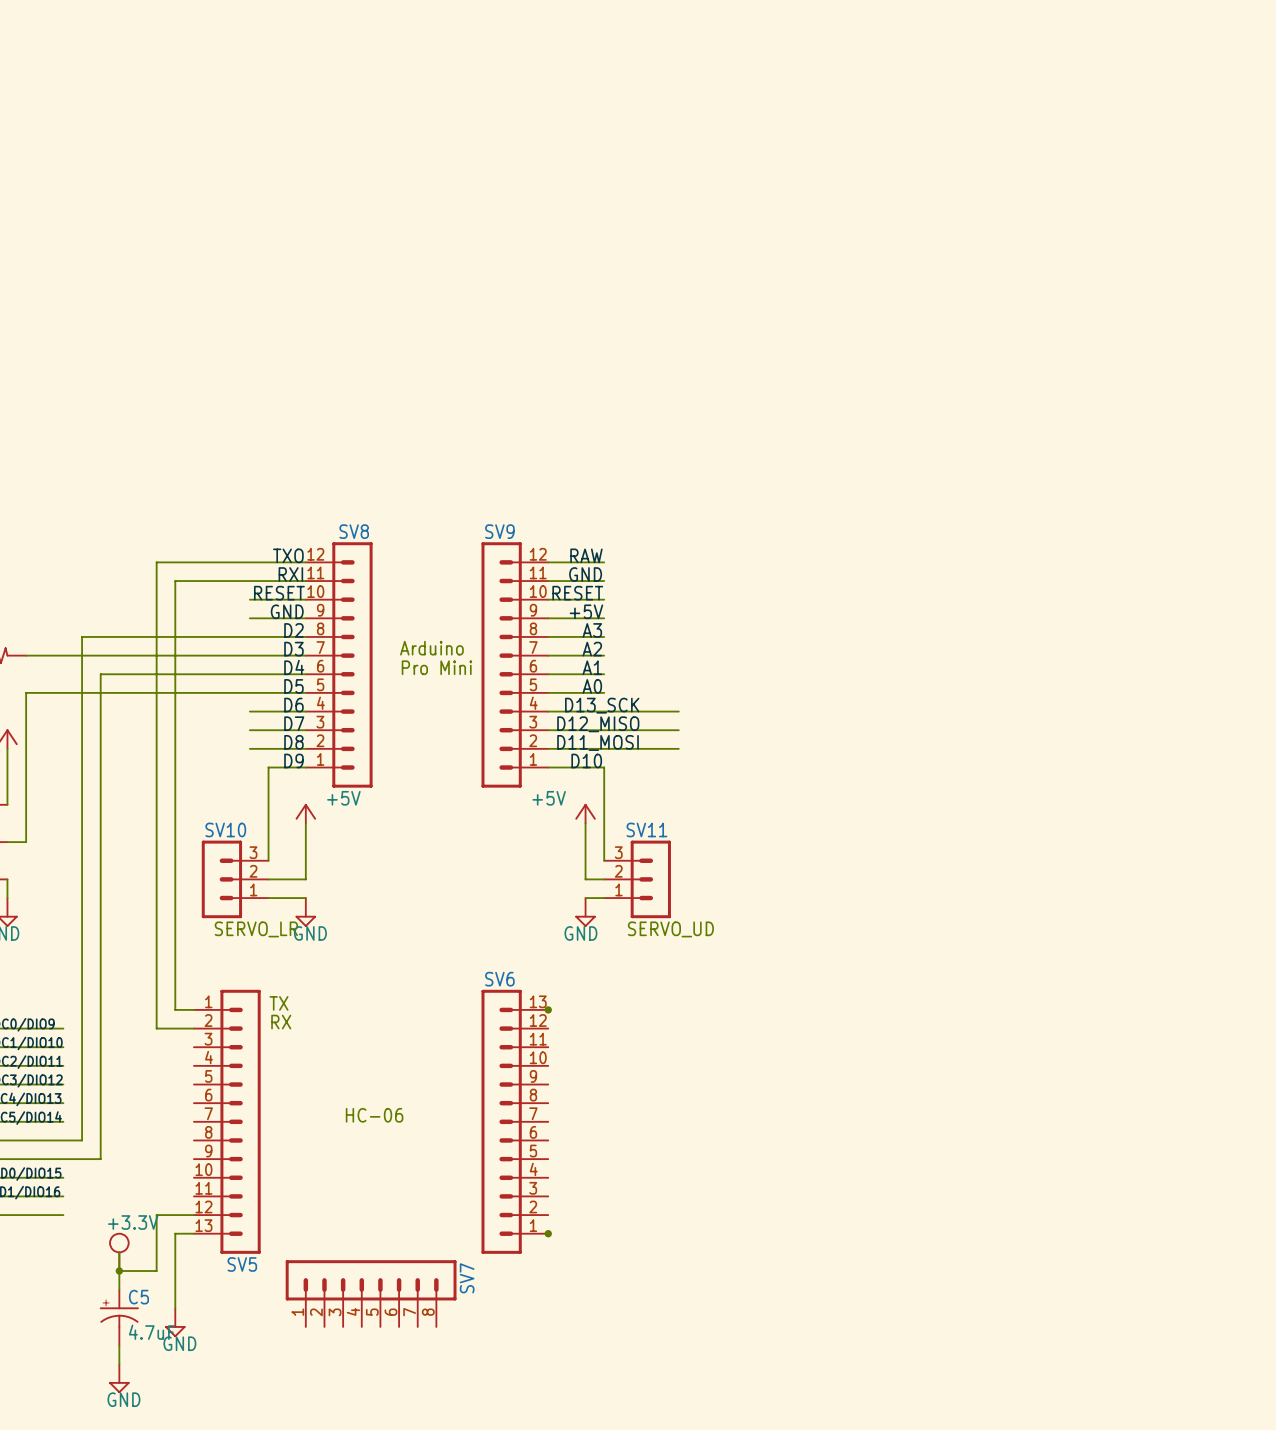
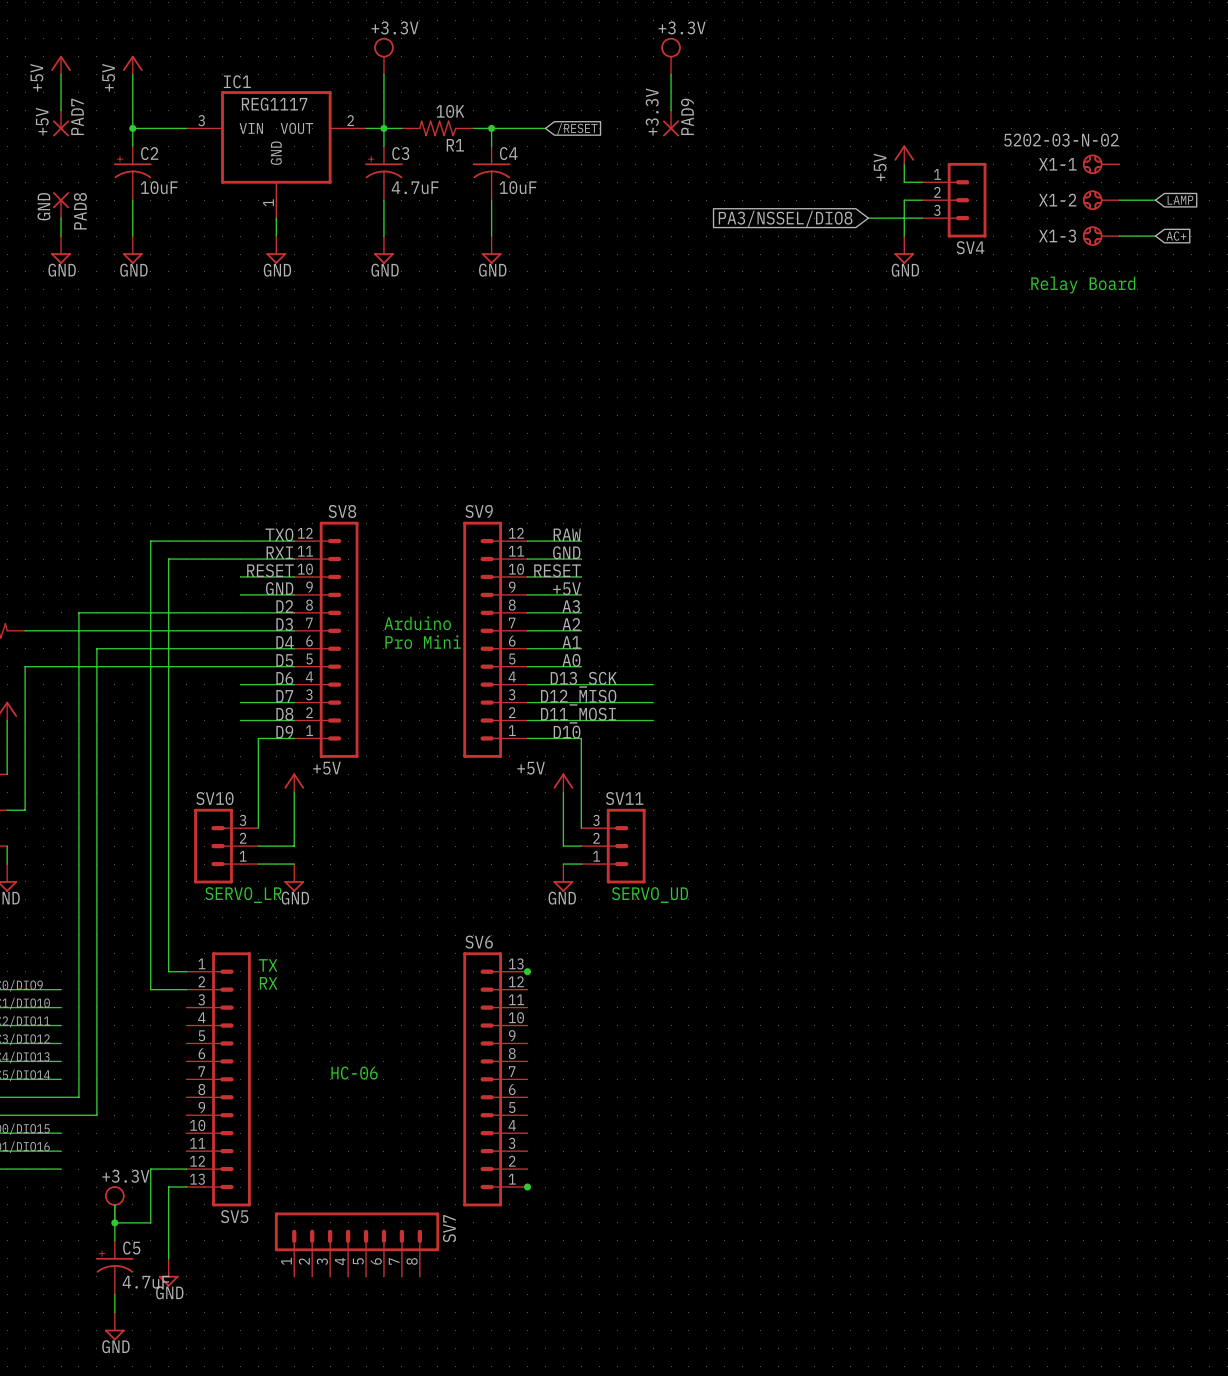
power symbol: none -> +3.3V (383, 56)
power symbol: none -> +3.3V (671, 56)
power symbol: none -> +5V (61, 65)
power symbol: none -> +5V (132, 65)
wire: none -> (61, 74) (61, 110)
wire: none -> (132, 74) (132, 146)
wire: none -> (383, 74) (383, 146)
wire: none -> (671, 74) (671, 110)
PAD7: none -> +5V (61, 123)
PAD9: none -> +3.3V (671, 123)
wire: none -> (132, 128) (186, 128)
junction: none -> (132, 128)
wire: none -> (366, 128) (401, 128)
junction: none -> (383, 128)
R1: none -> 10K (437, 128)
wire: none -> (473, 128) (545, 128)
wire: none -> (491, 128) (491, 146)
junction: none -> (491, 128)
global label: none -> /RESET (577, 128)
IC1: none -> REG1117 (276, 154)
power symbol: none -> +5V (904, 154)
wire: none -> (904, 164) (904, 182) (922, 182)
X1-1: none -> 5202-03-N-02 (1101, 164)
C2: none -> 10uF (132, 173)
C3: none -> 4.7uF (383, 173)
C4: none -> 10uF (491, 173)
wire: none -> (132, 200) (132, 236)
wire: none -> (383, 200) (383, 236)
wire: none -> (491, 200) (491, 236)
wire: none -> (922, 200) (904, 200) (904, 236)
SV4: none -> (954, 200)
X1-2: none -> (1101, 200)
wire: none -> (1119, 200) (1155, 200)
global label: none -> LAMP (1180, 200)
PAD8: none -> GND (61, 205)
wire: none -> (61, 218) (61, 236)
wire: none -> (276, 218) (276, 236)
wire: none -> (868, 218) (922, 218)
global label: none -> PA3/NSSEL/DIO8 (785, 218)
X1-3: none -> (1101, 236)
wire: none -> (1119, 236) (1155, 236)
global label: none -> AC+ (1176, 236)
power symbol: none -> GND (61, 249)
power symbol: none -> GND (132, 249)
power symbol: none -> GND (276, 249)
power symbol: none -> GND (383, 249)
power symbol: none -> GND (491, 249)
power symbol: none -> GND (904, 249)
text: none -> Relay Board (1083, 285)

